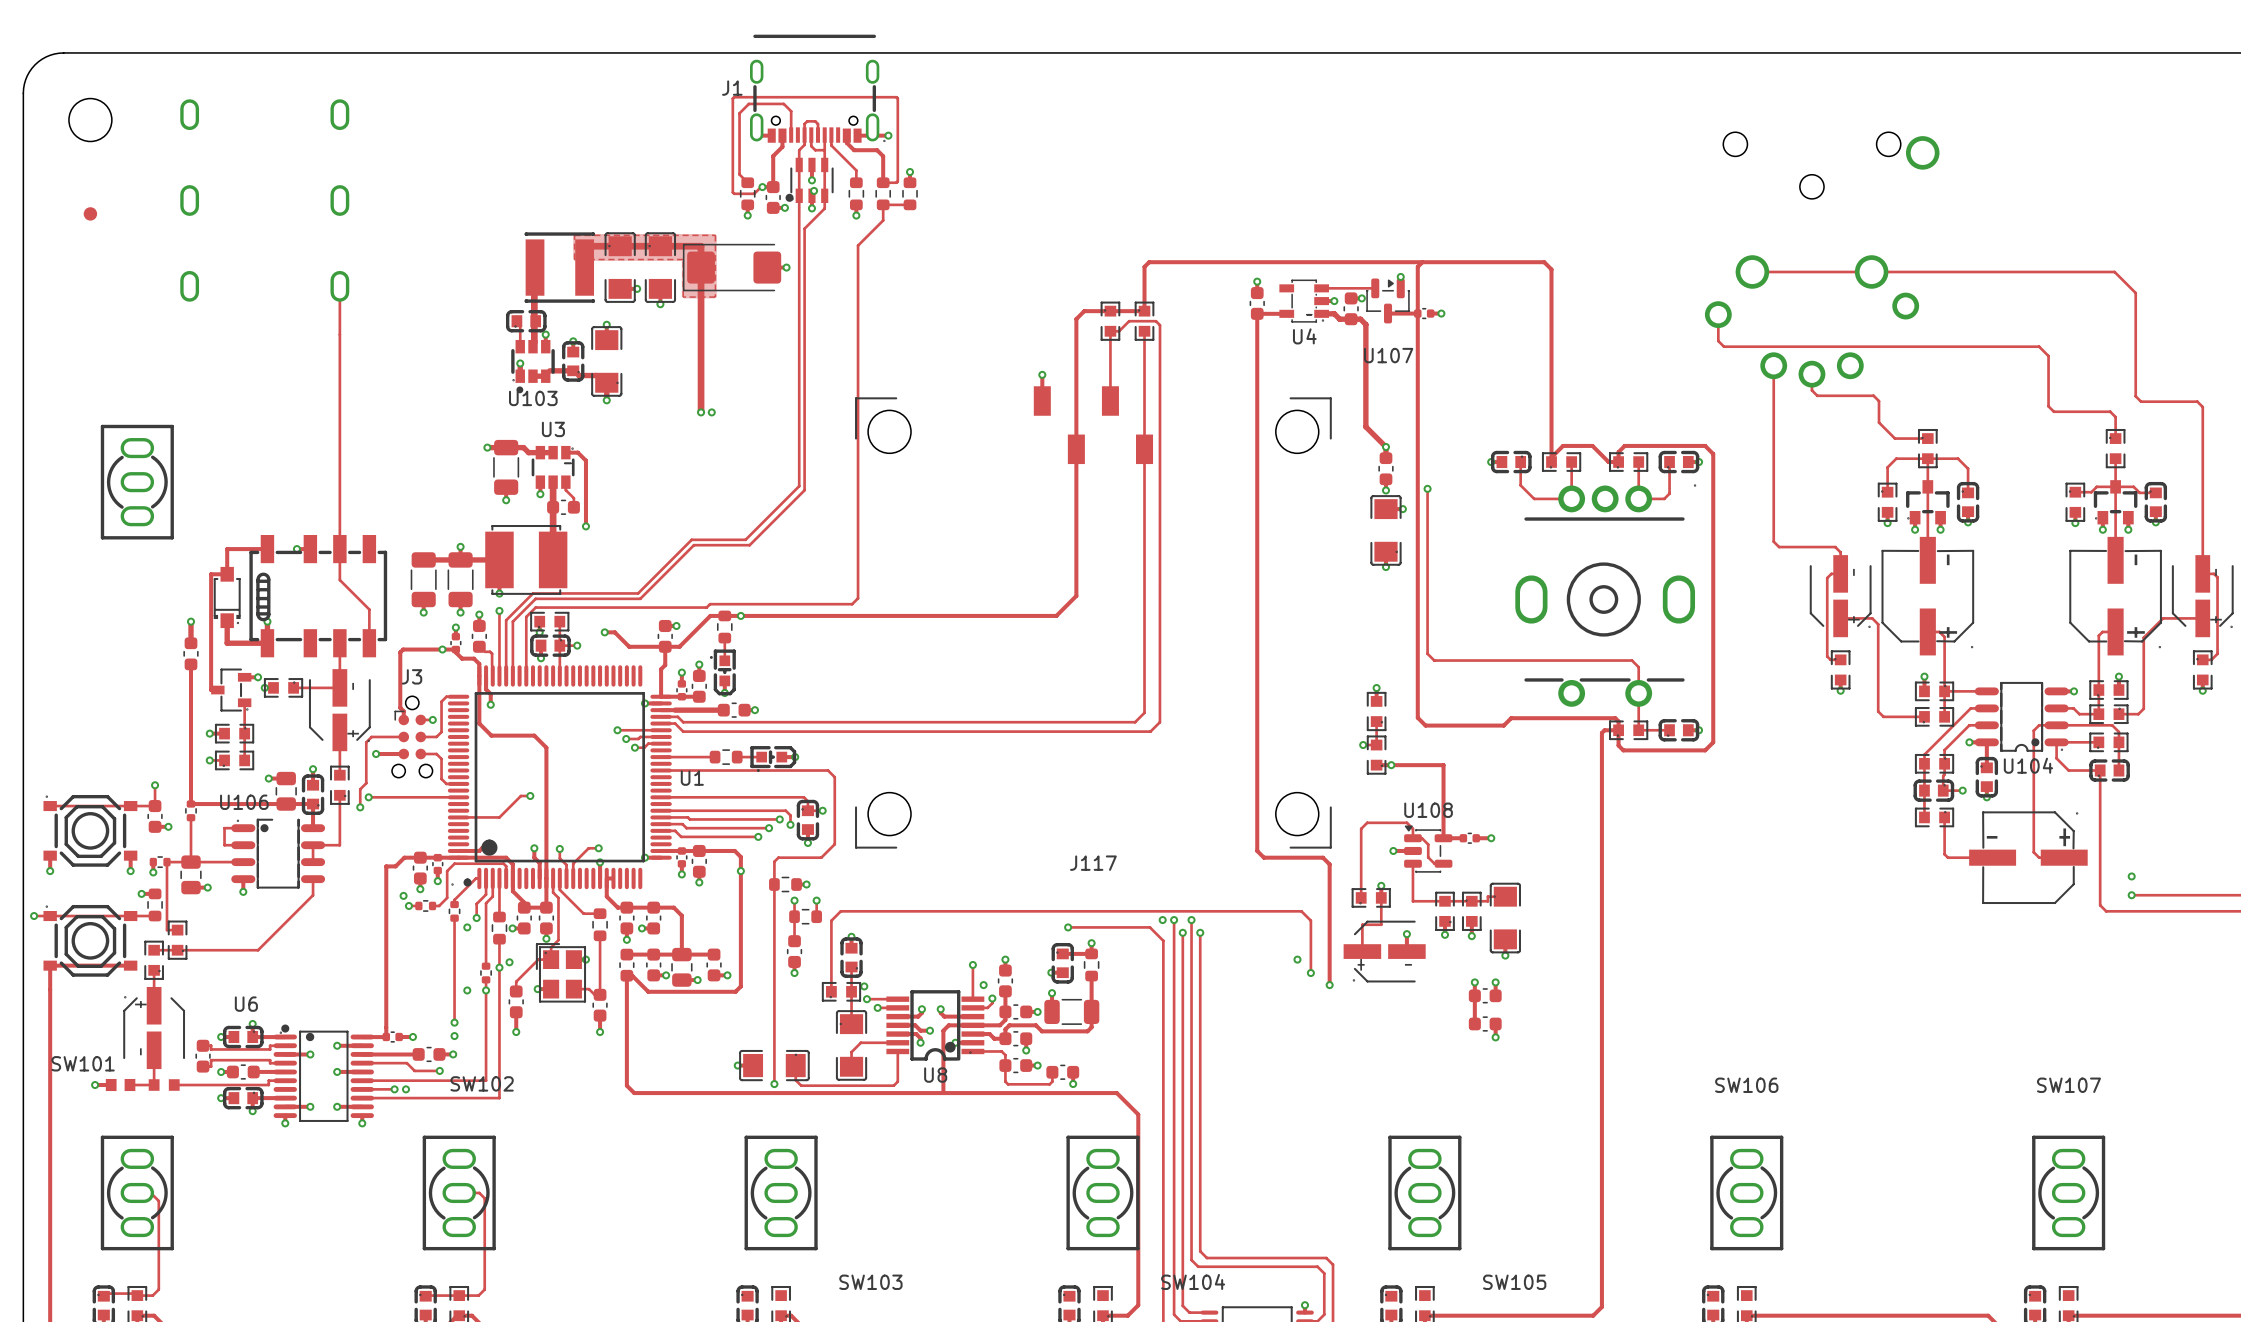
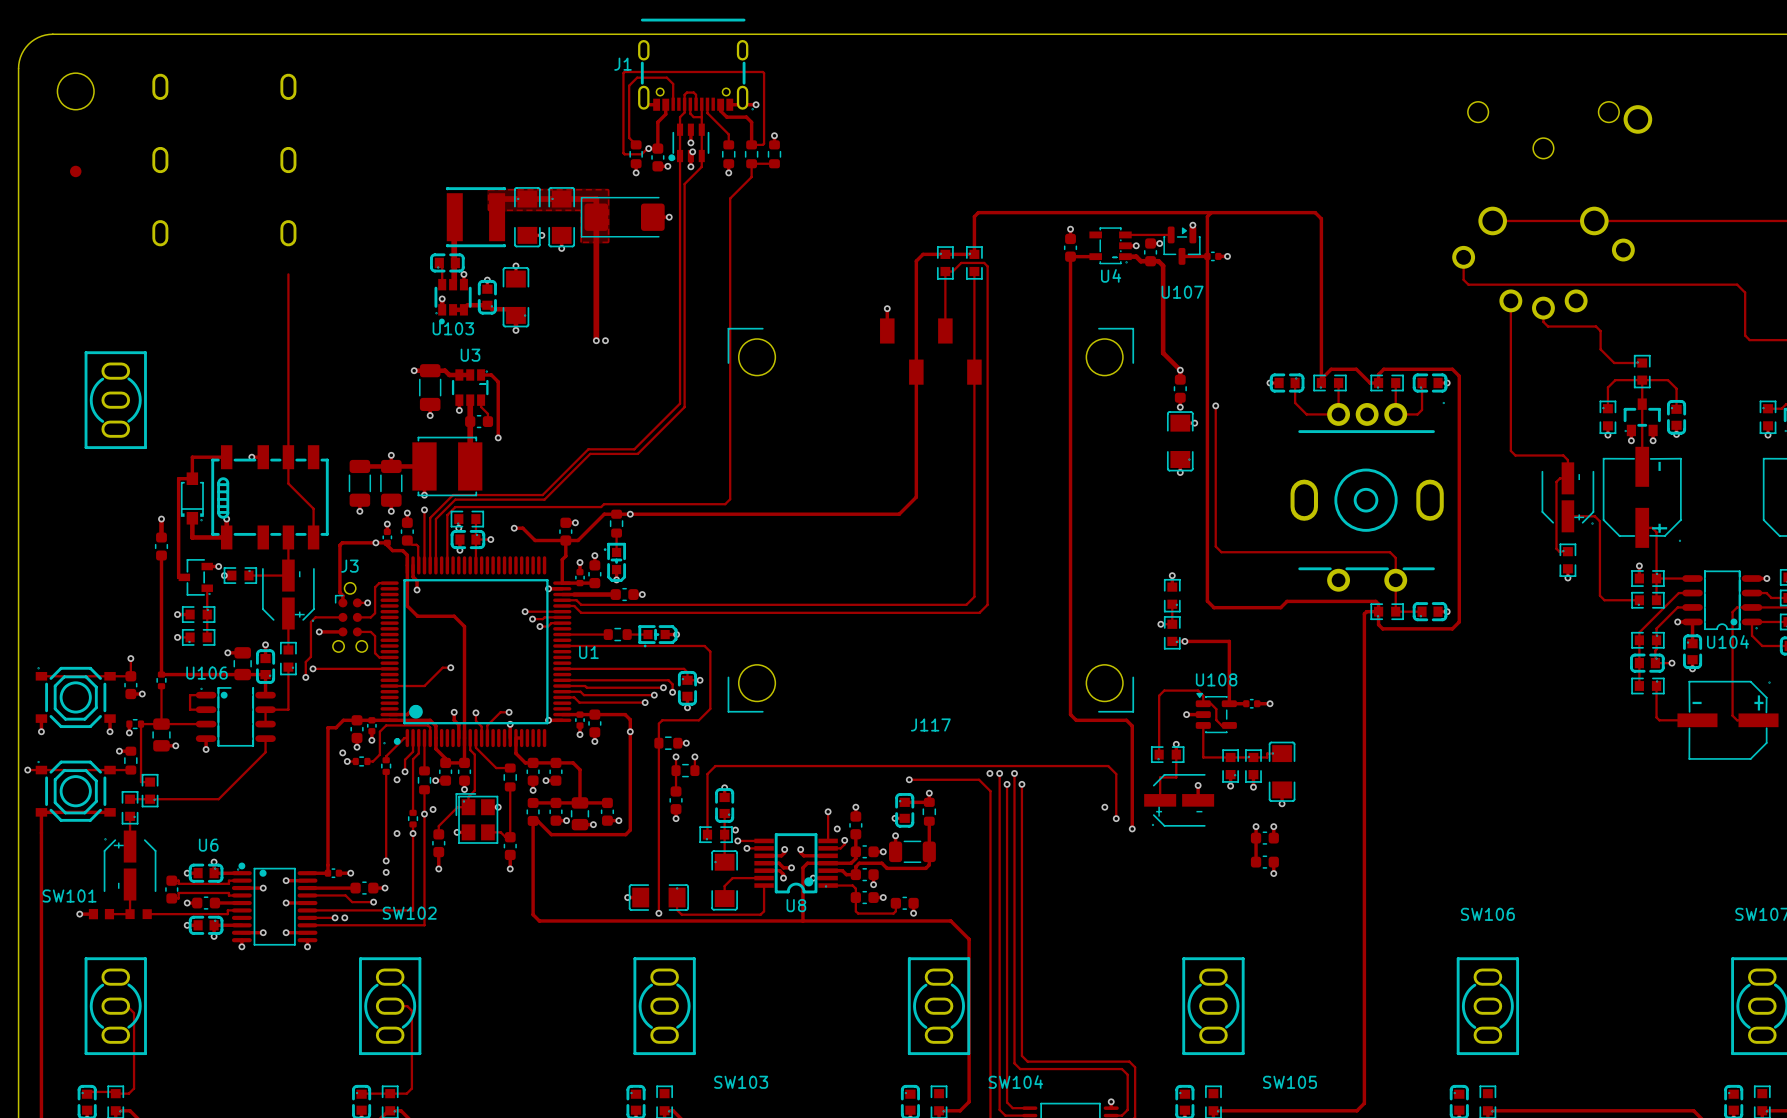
track: (339, 286) (339, 334) -> none

